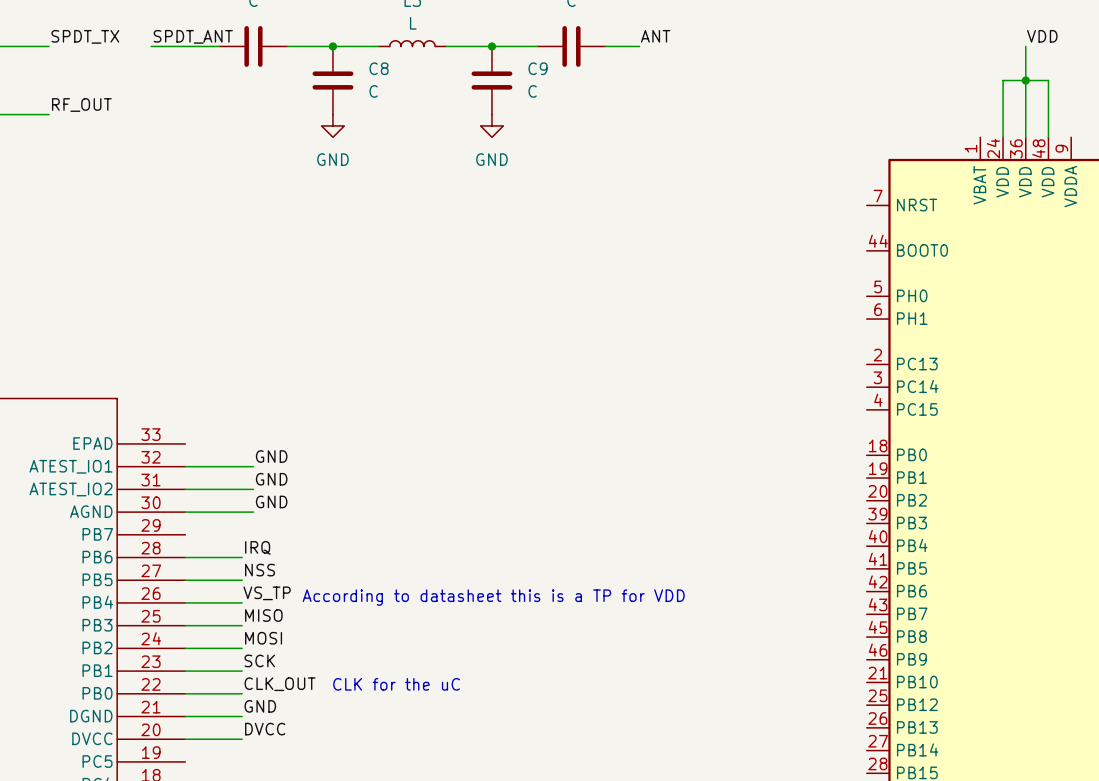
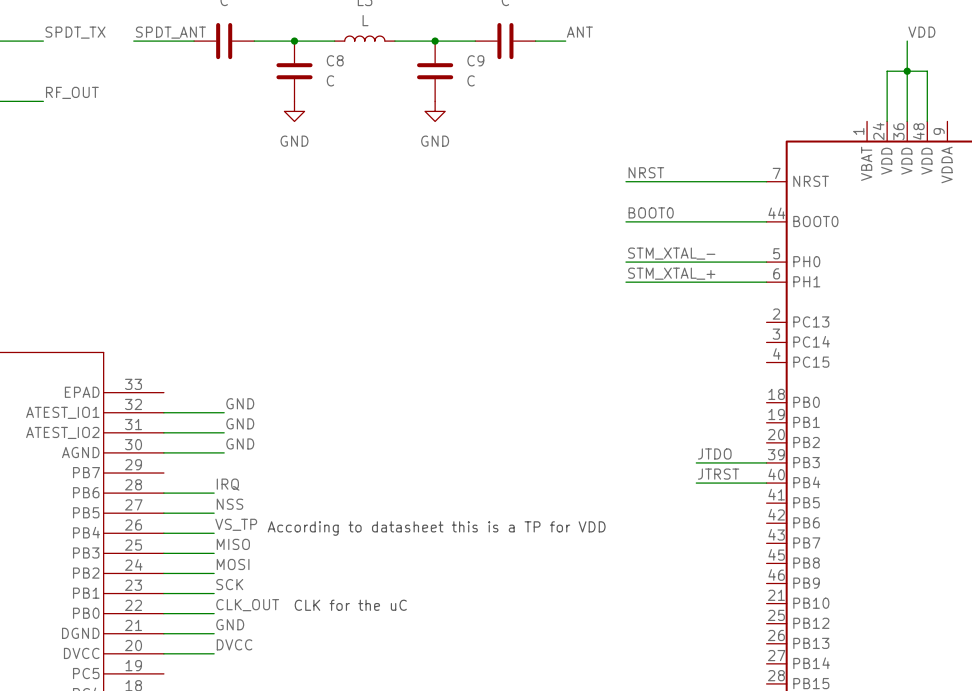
label: none -> NRST (646, 172)
wire: none -> (625, 181) (766, 181)
label: none -> BOOT0 (651, 212)
wire: none -> (625, 221) (766, 221)
label: none -> STM_XTAL_- (671, 253)
wire: none -> (625, 262) (766, 262)
label: none -> STM_XTAL_+ (671, 273)
wire: none -> (625, 282) (766, 282)
label: none -> JTDO (714, 454)
wire: none -> (696, 462) (766, 462)
label: none -> JTRST (718, 474)
wire: none -> (696, 483) (766, 483)

